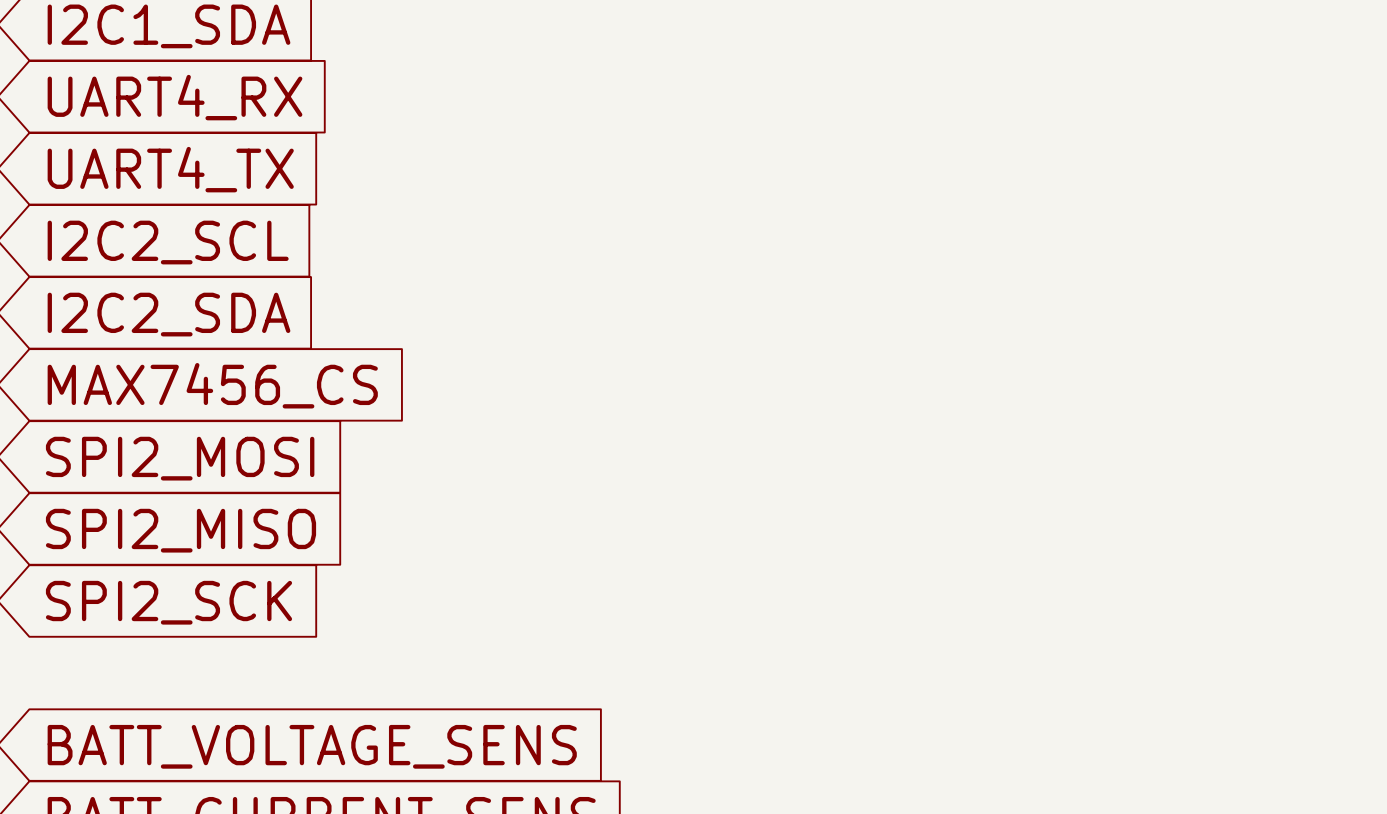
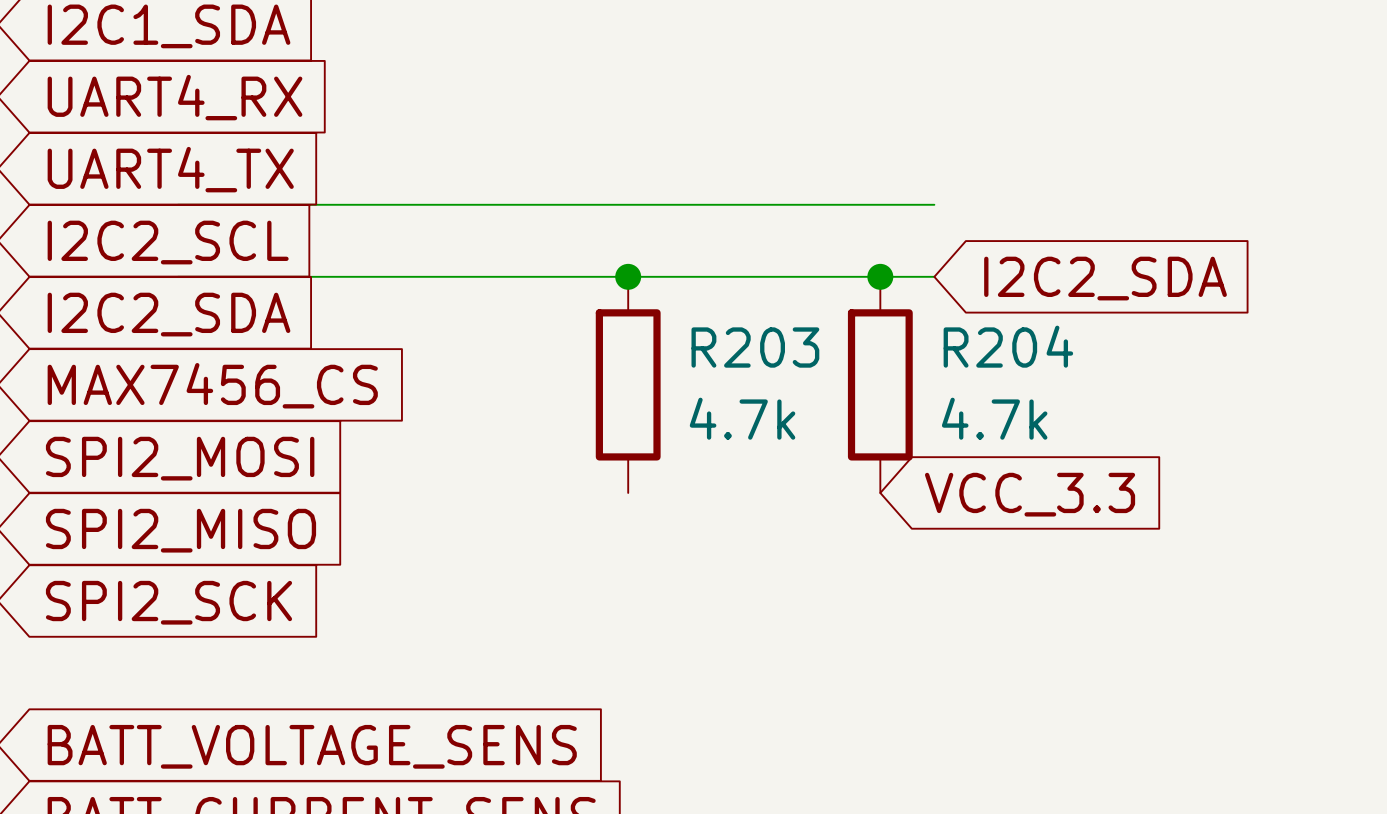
wire: none -> (177, 204) (934, 204)
wire: none -> (177, 276) (934, 276)
junction: none -> (628, 276)
junction: none -> (880, 276)
global label: none -> I2C2_SDA (1105, 278)
R203: none -> 4.7k (628, 384)
R204: none -> 4.7k (880, 384)
global label: none -> VCC_3.3 (1030, 494)

